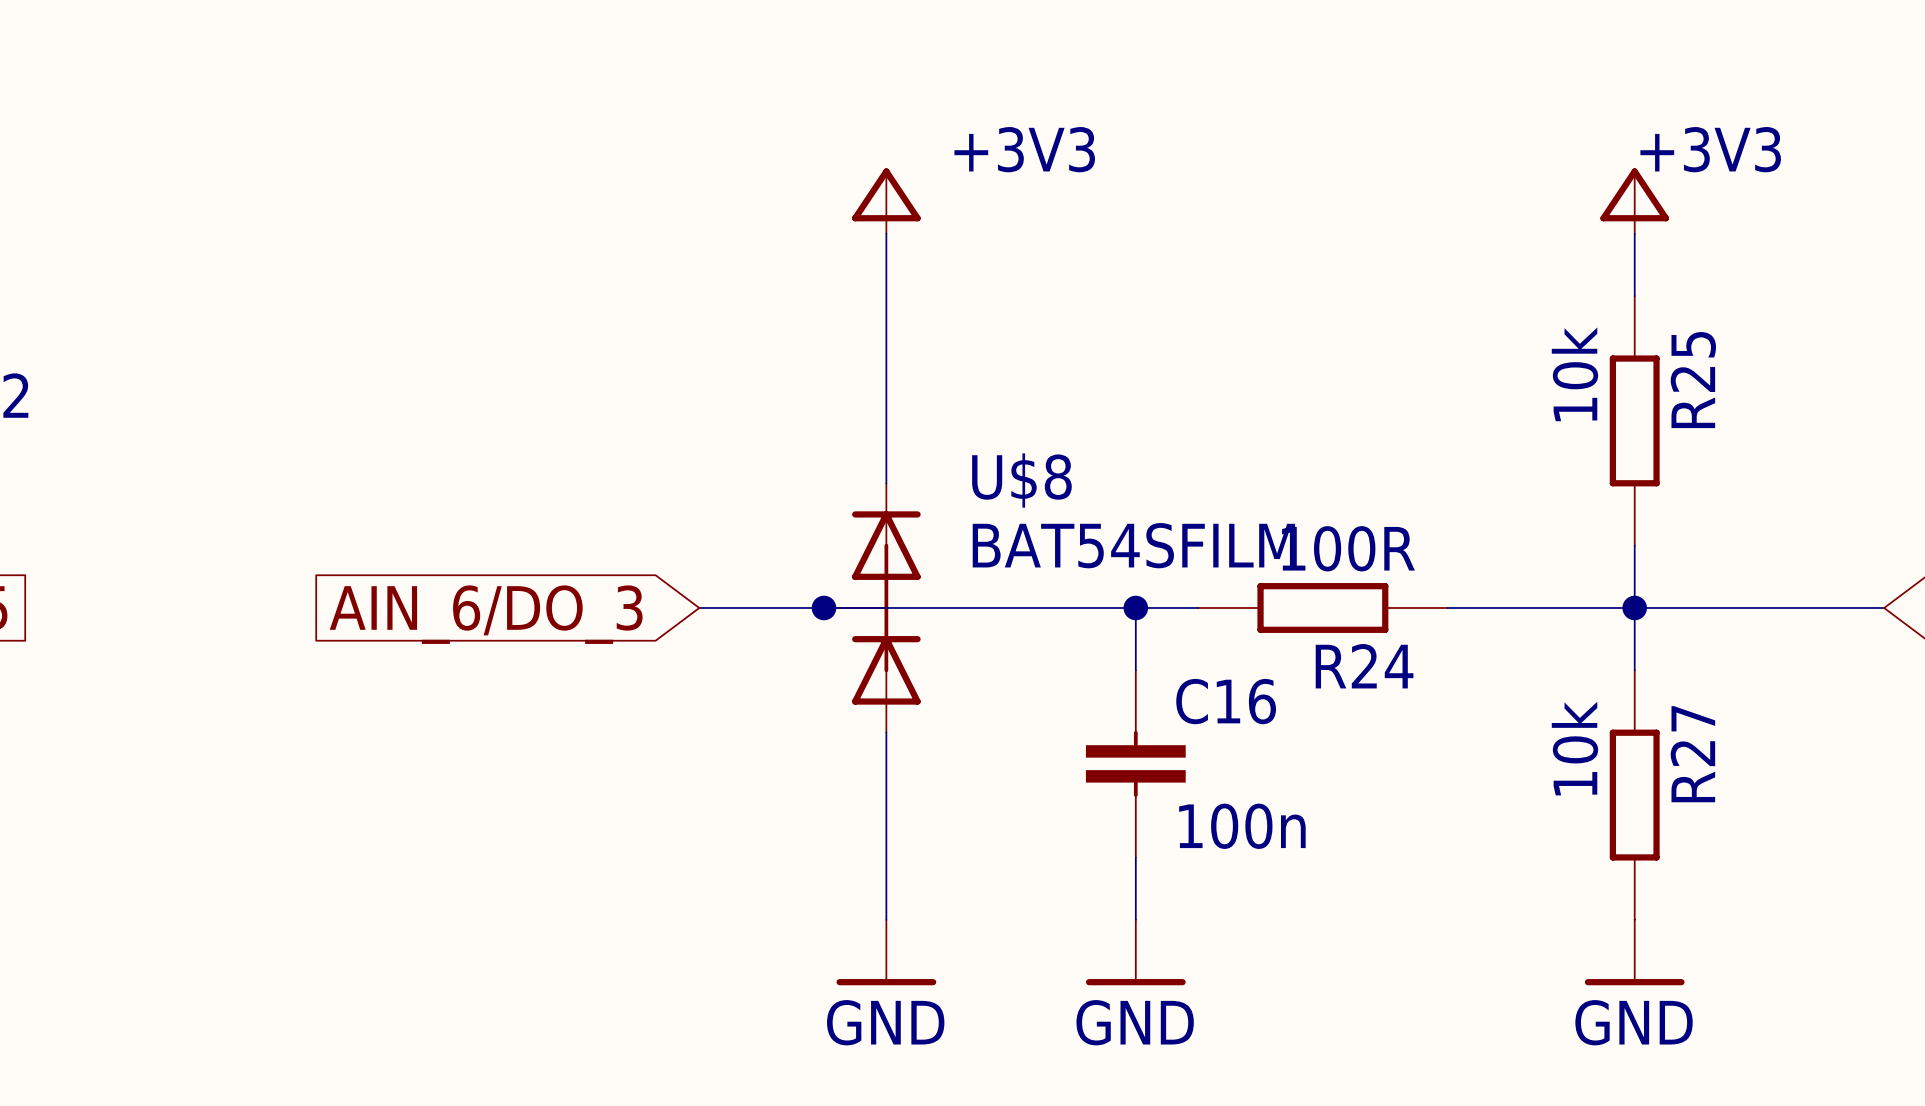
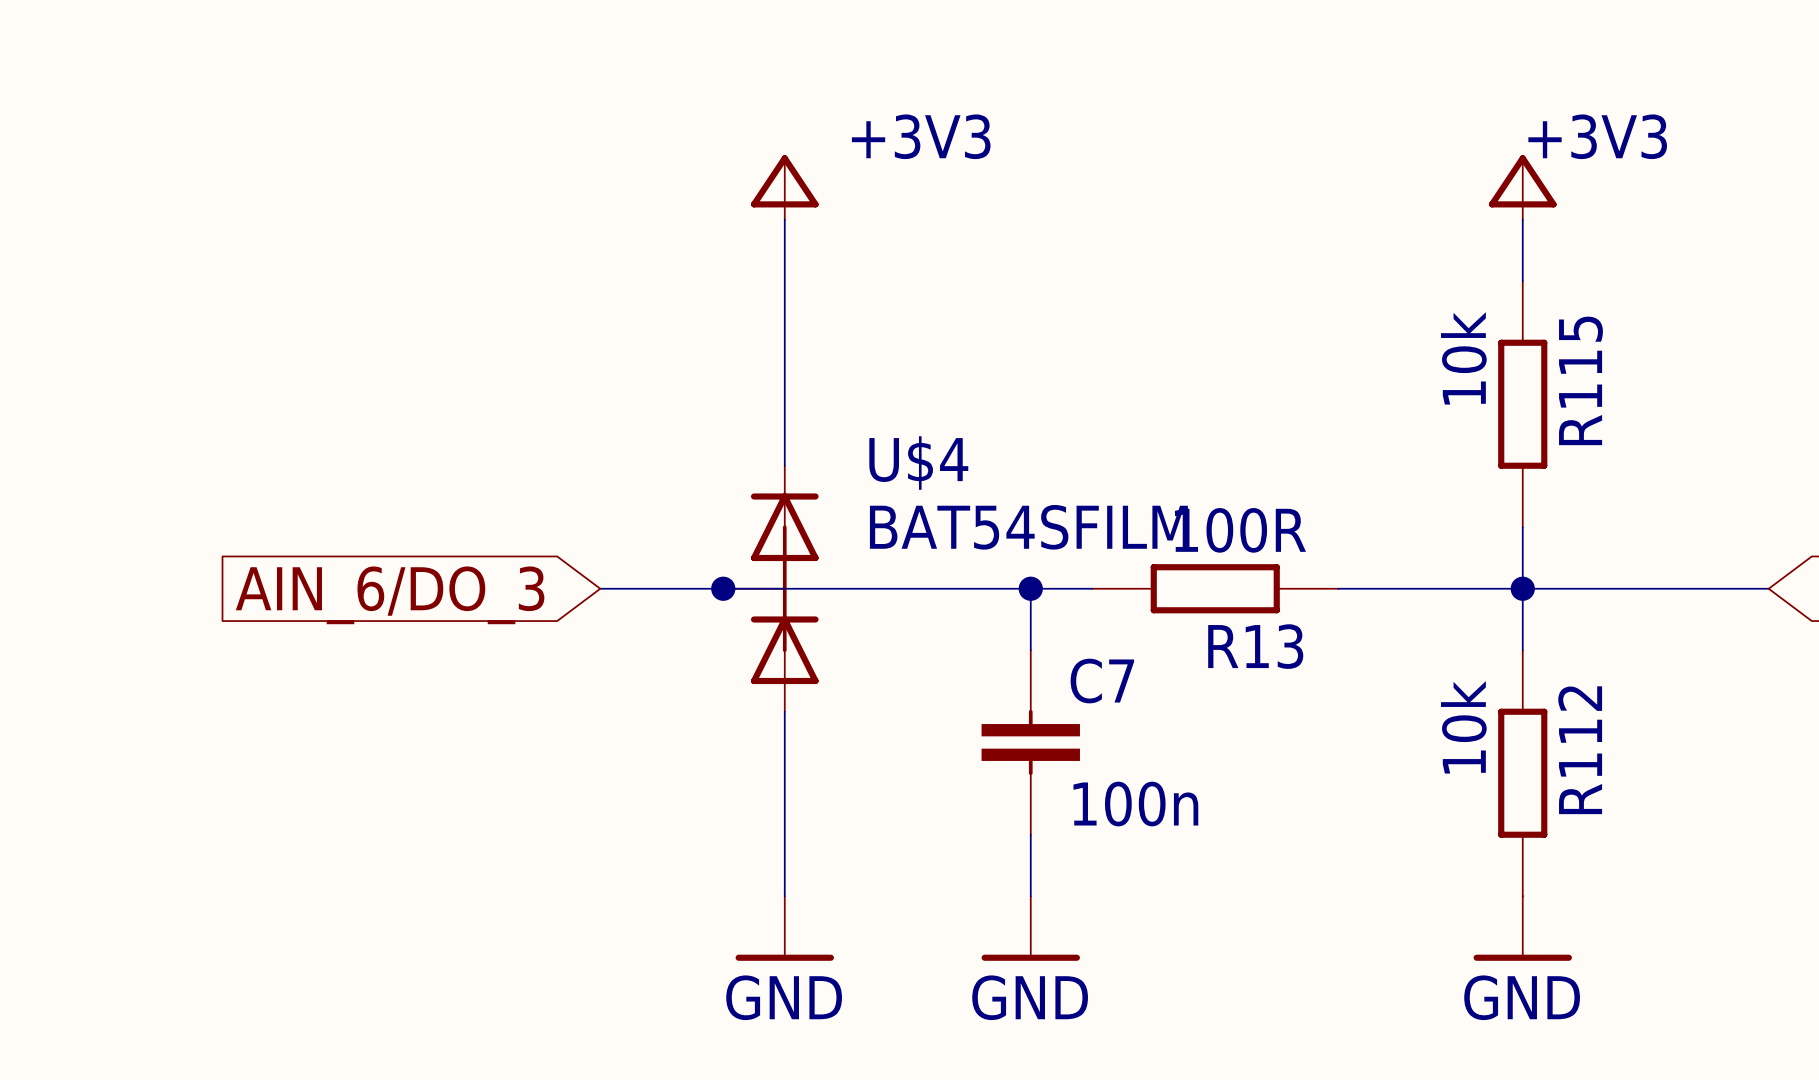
R25 name: R25 (1693, 380) -> R115 (1580, 380)
U$8 name: U$8 (1021, 480) -> U$4 (918, 463)
R24 name: R24 (1364, 666) -> R13 (1255, 646)
C16 name: C16 (1226, 701) -> C7 (1102, 681)
R27 name: R27 (1692, 754) -> R112 (1580, 750)

